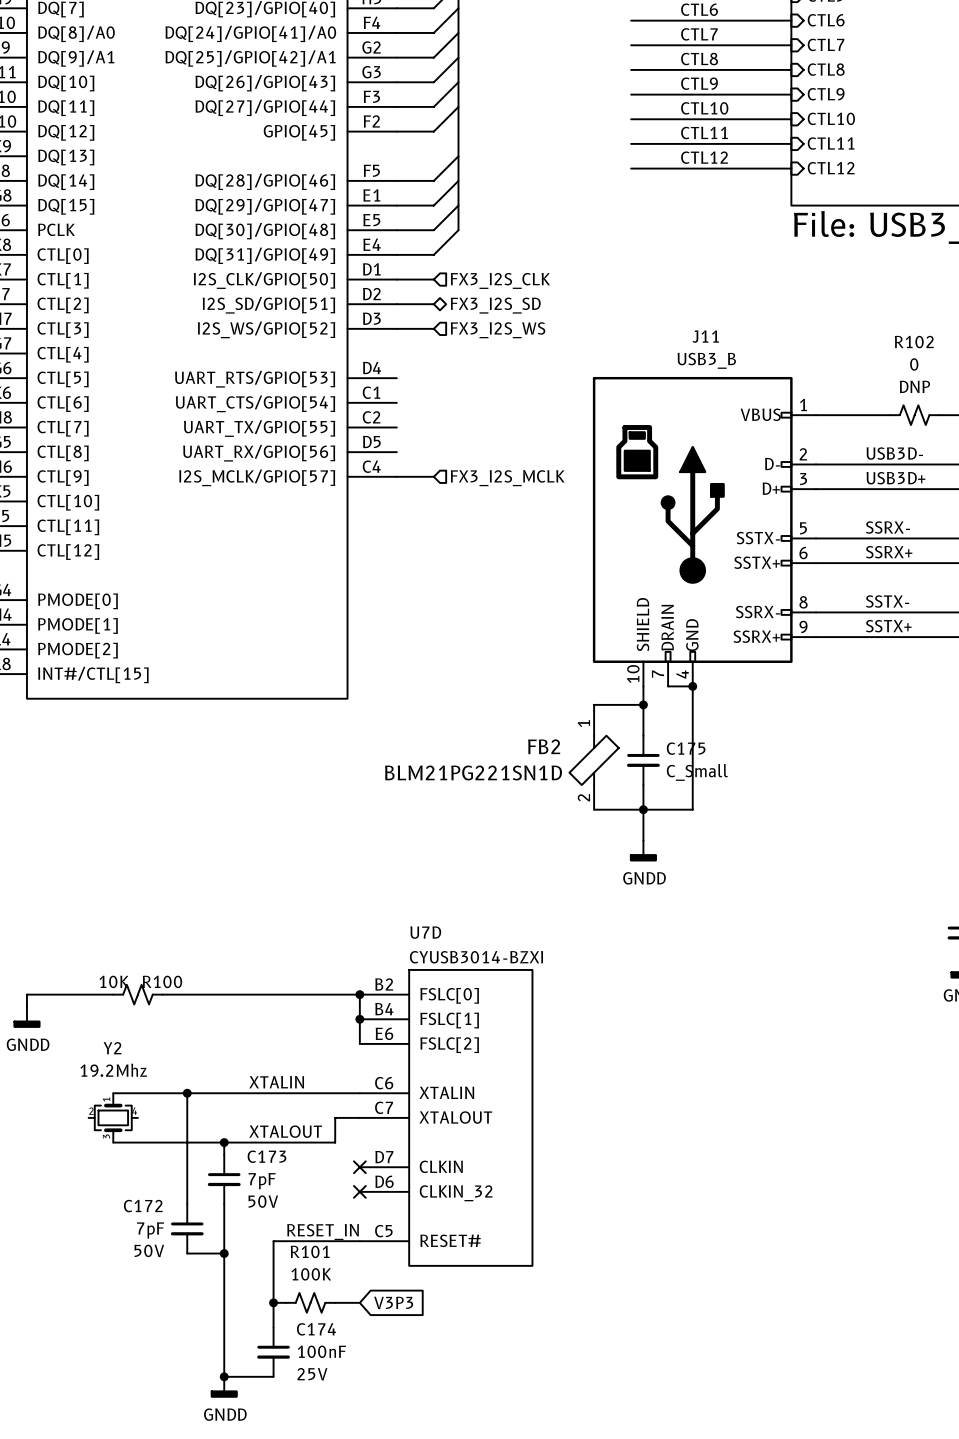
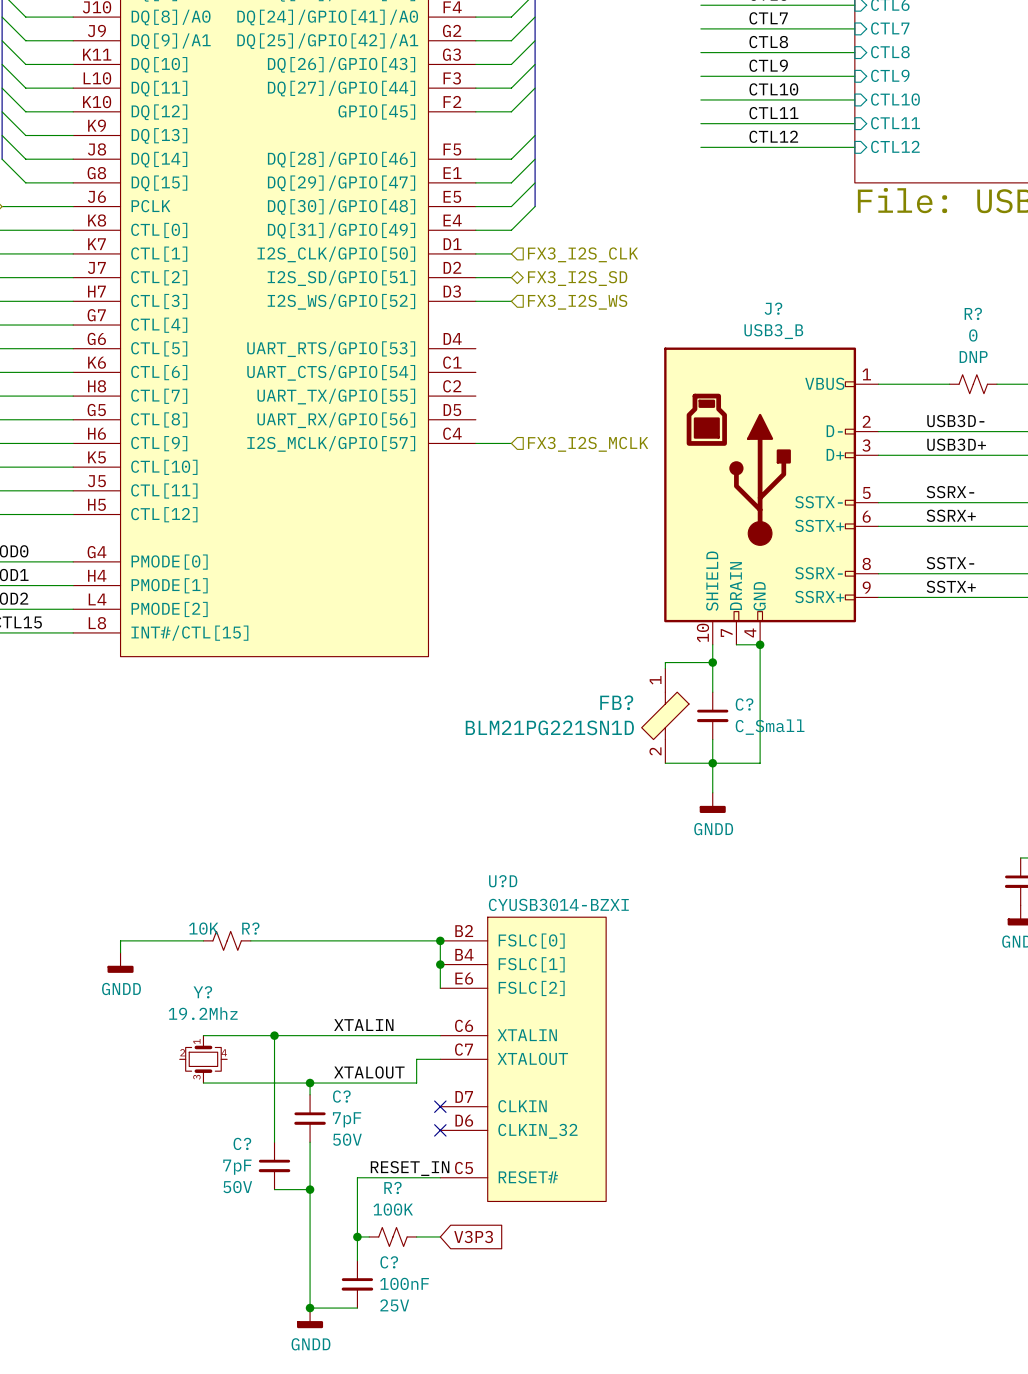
J11 name: J11 (705, 336) -> J? (773, 308)
R102 name: R102 (914, 342) -> R? (973, 313)
FB2 name: FB2 (544, 746) -> FB? (616, 702)
C175 name: C175 (686, 748) -> C? (744, 704)
U7D name: U7D (425, 932) -> U?D (503, 881)
R100 name: R100 (162, 981) -> R? (250, 928)
Y2 name: Y2 (112, 1048) -> Y? (202, 992)
C173 name: C173 (266, 1156) -> C? (341, 1096)
C172 name: C172 (143, 1206) -> C? (242, 1143)
R101 name: R101 (310, 1251) -> R? (392, 1187)
C174 name: C174 (316, 1329) -> C? (389, 1262)

